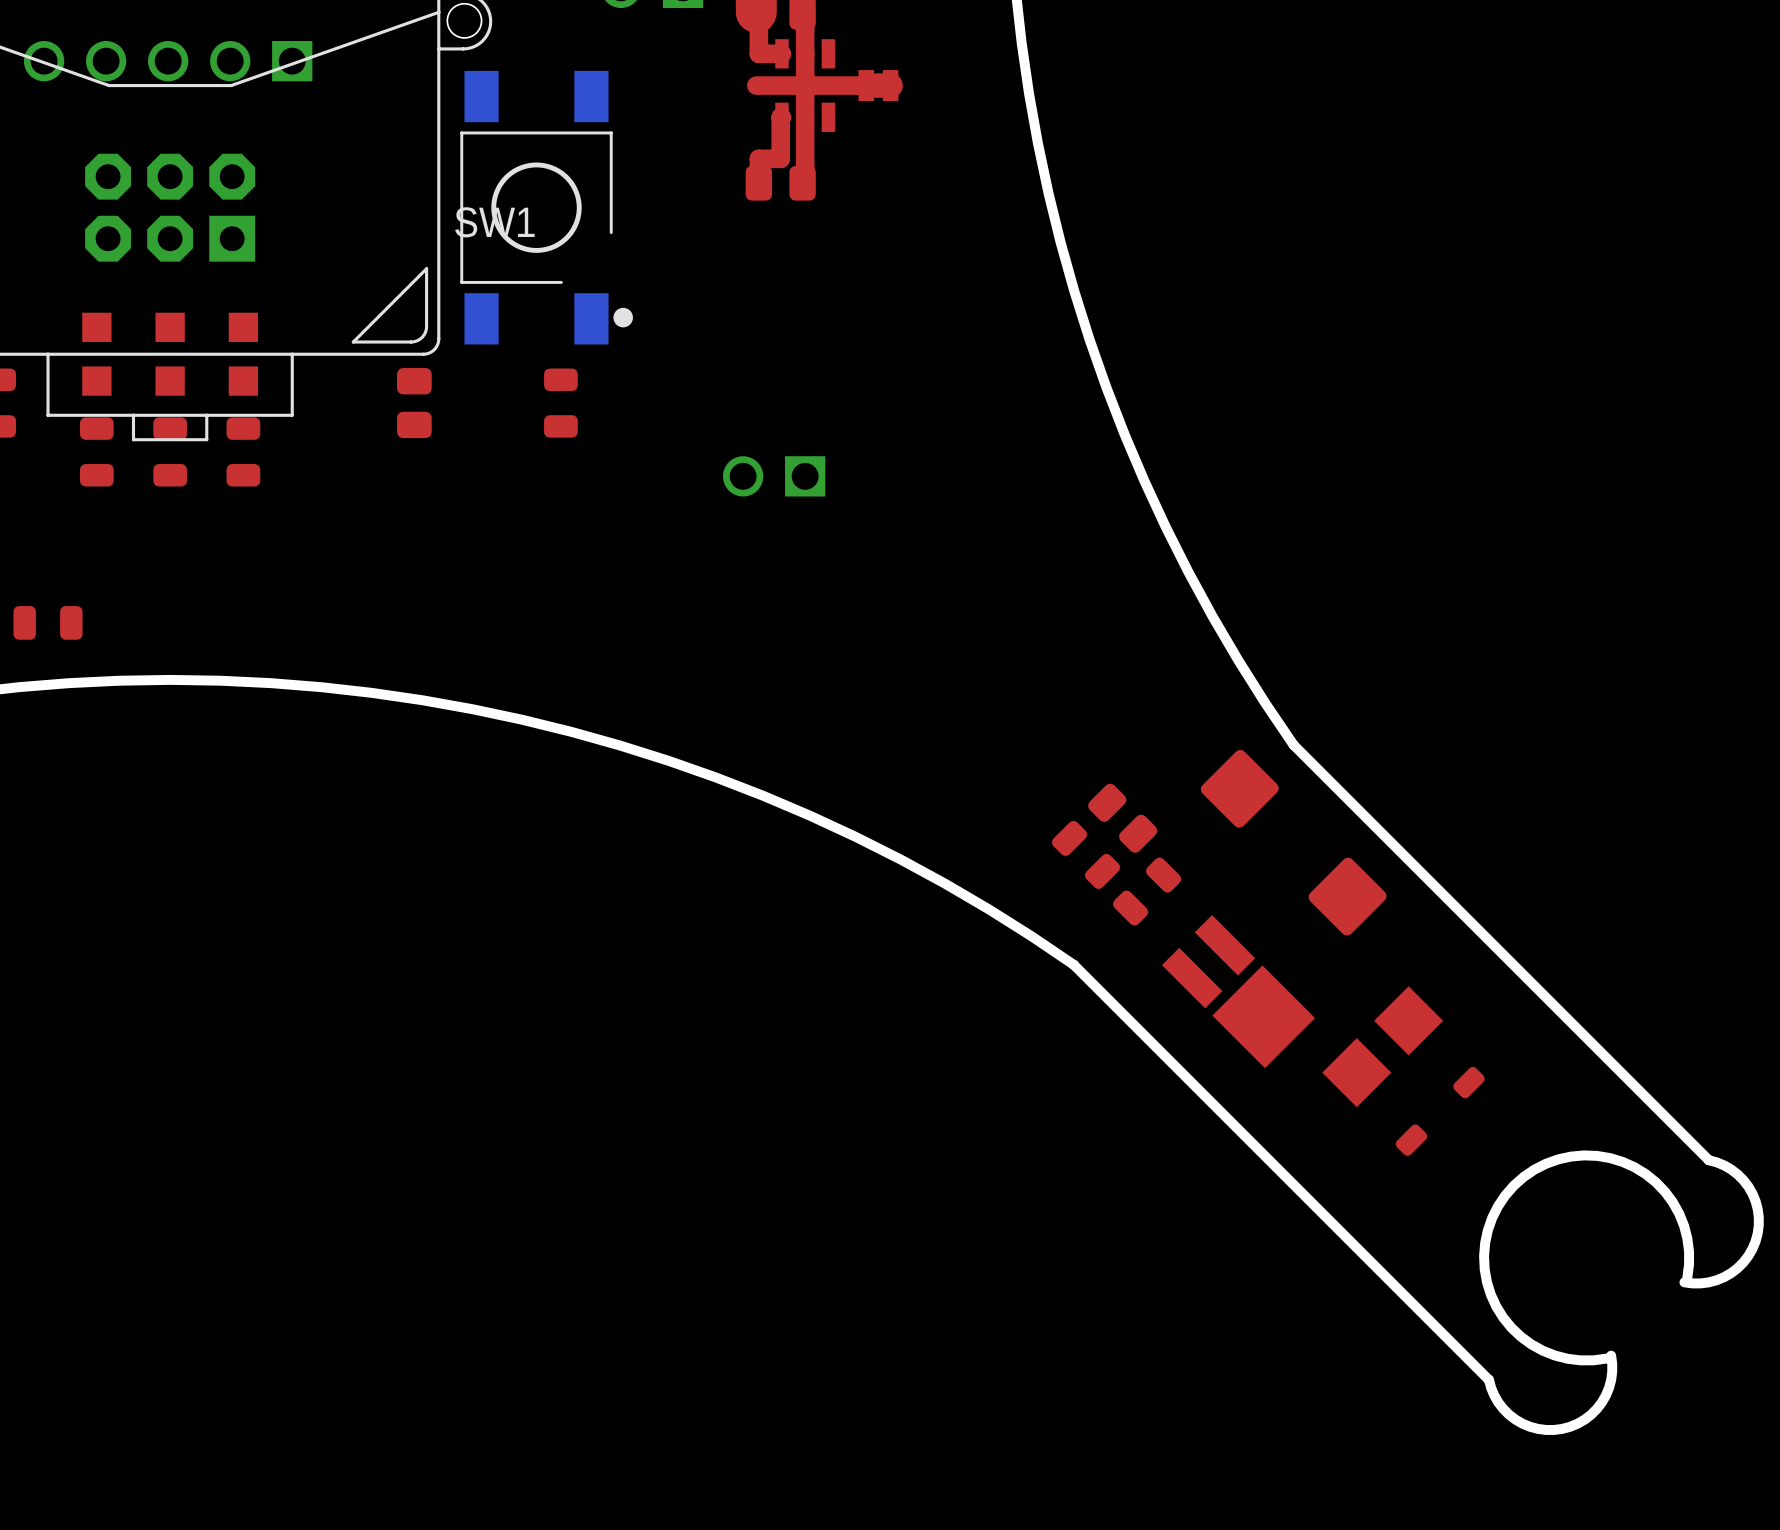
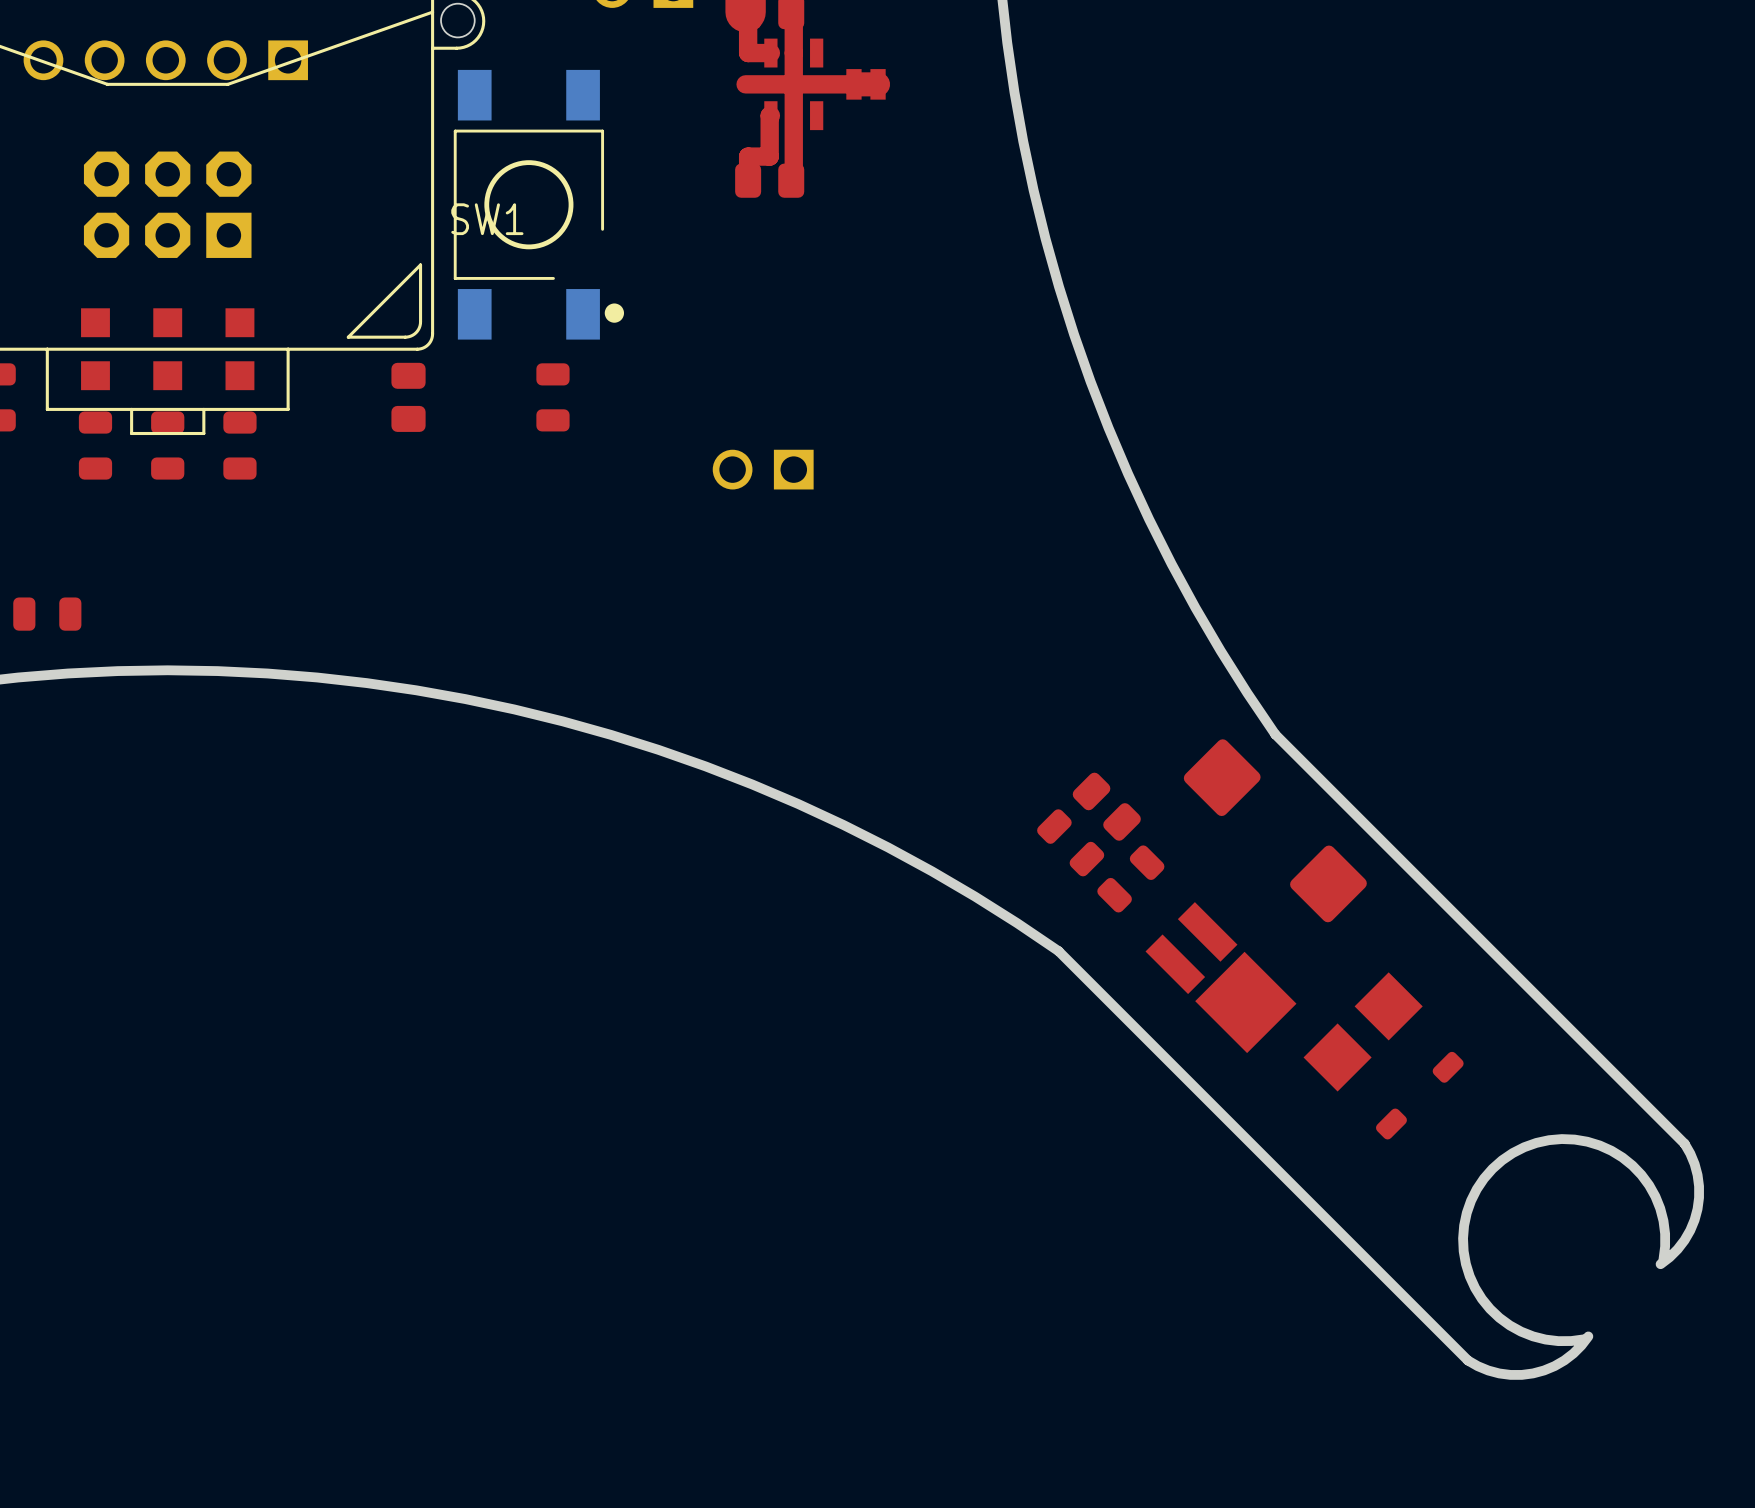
board edge: (1708, 1160) (1731, 1169) (1748, 1186) (1757, 1209) (1757, 1233) (1748, 1255) (1731, 1273) (1708, 1282) (1684, 1282) -> (1684, 1143) (1697, 1175) (1697, 1208) (1684, 1240) (1660, 1264)
board edge: (1611, 1355) (1611, 1379) (1601, 1402) (1584, 1419) (1562, 1428) (1538, 1428) (1515, 1419) (1498, 1402) (1489, 1380) -> (1588, 1336) (1564, 1360) (1533, 1373) (1499, 1373) (1467, 1360)

